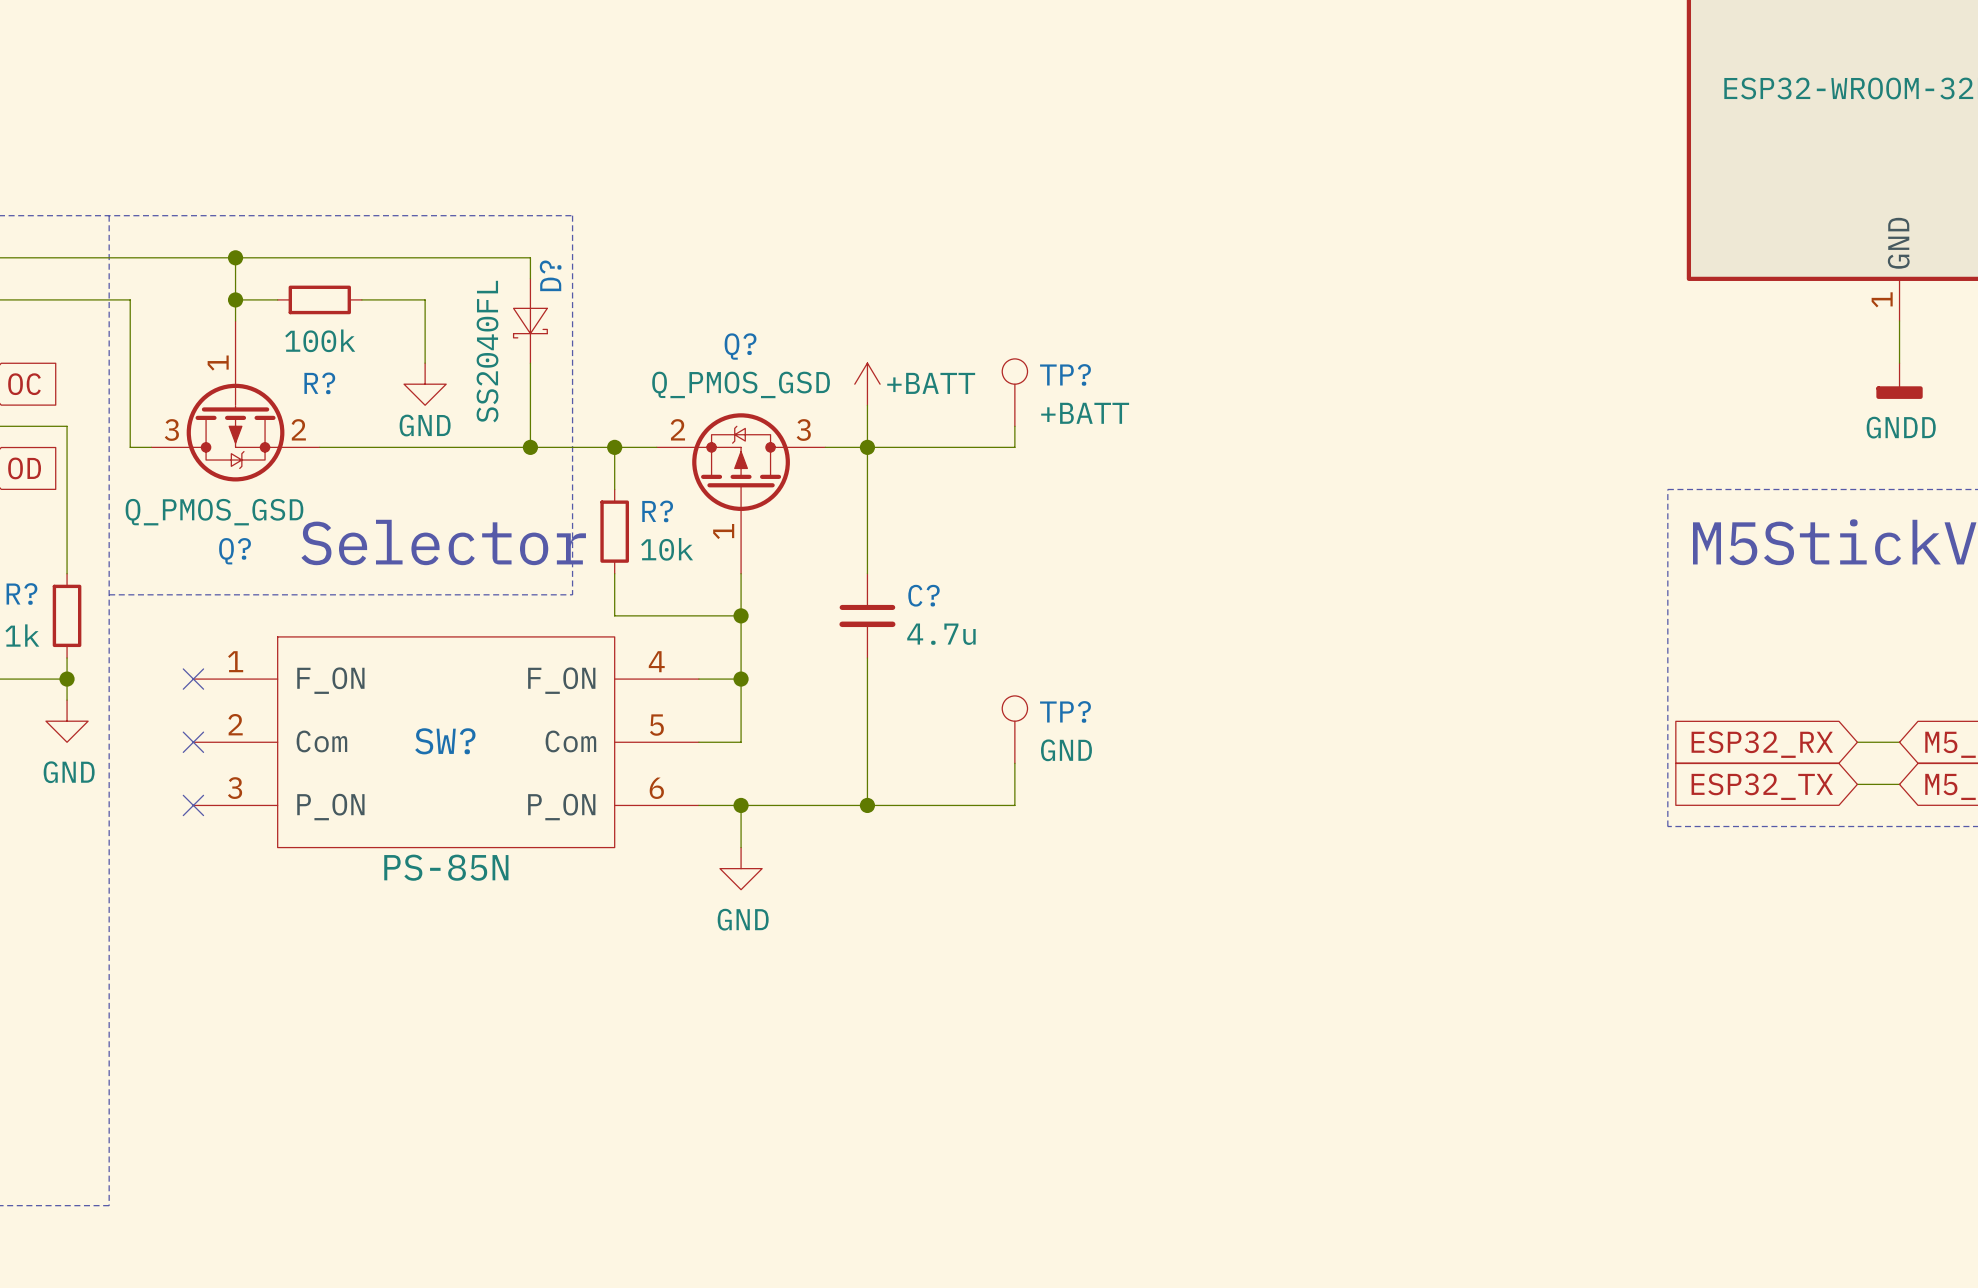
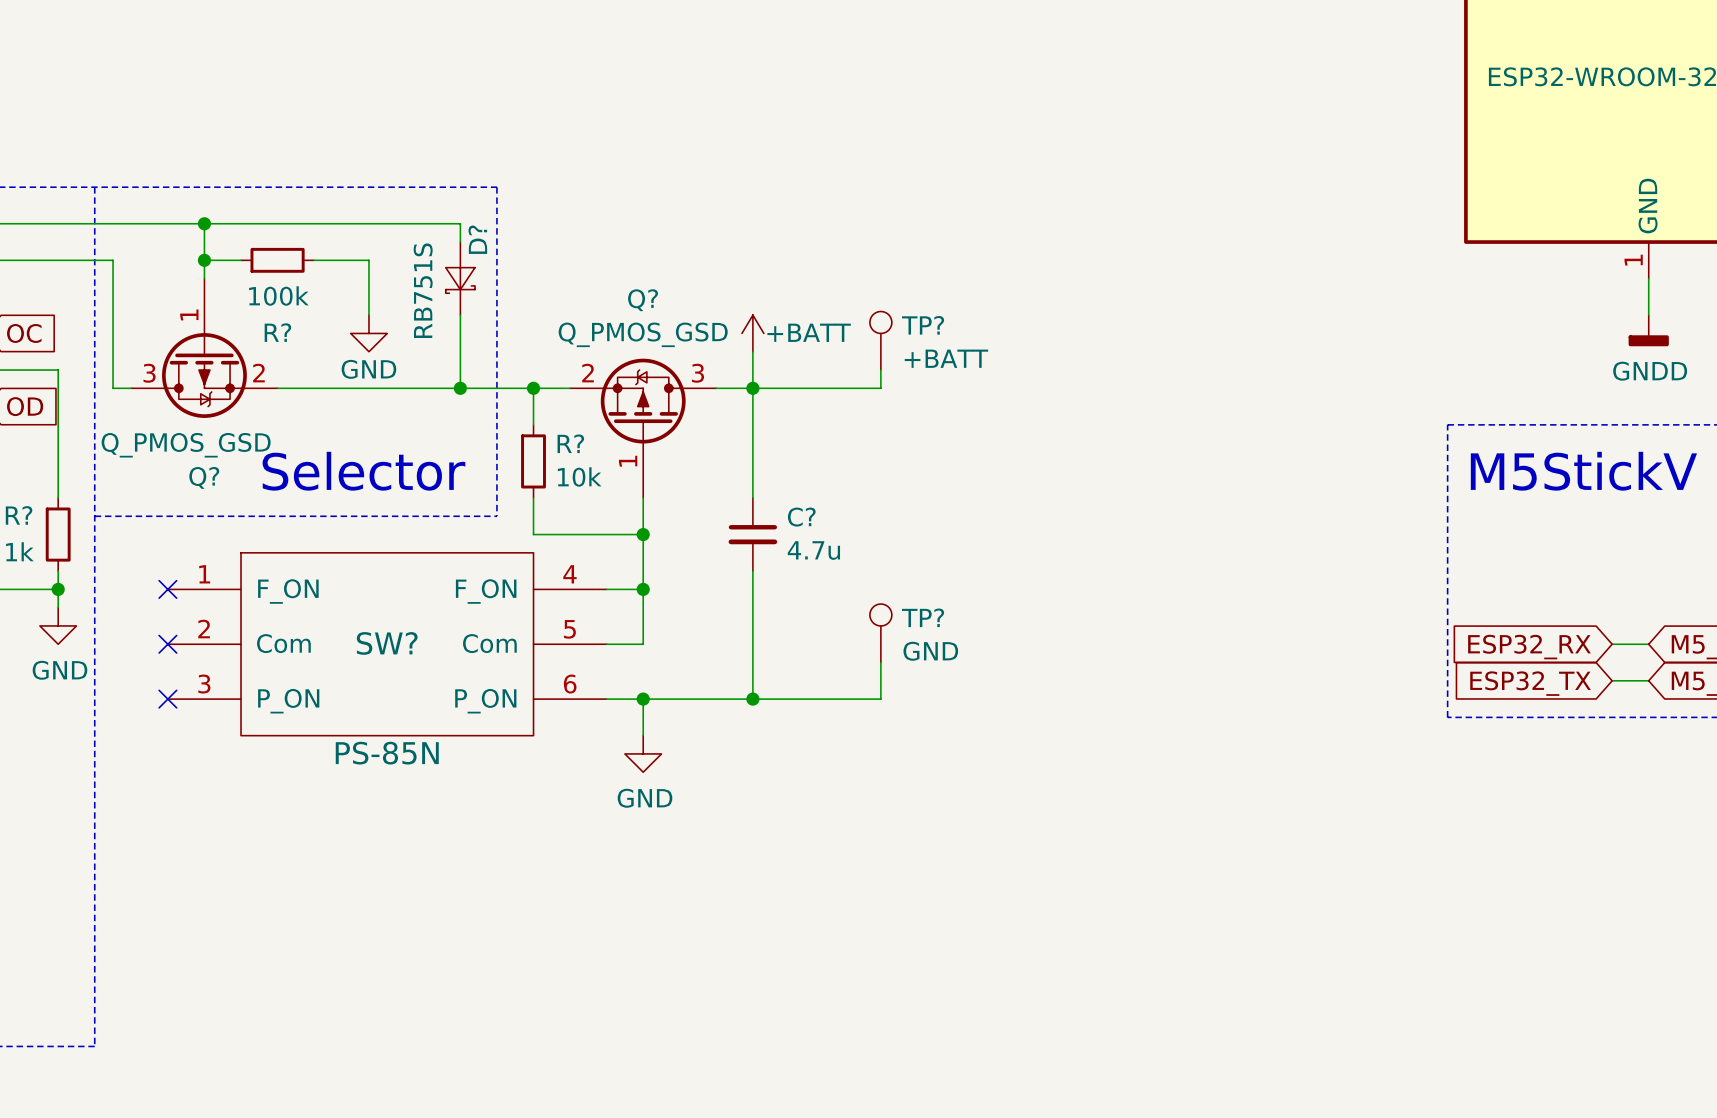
D? value: SS2040FL (487, 351) -> RB751S (423, 290)

